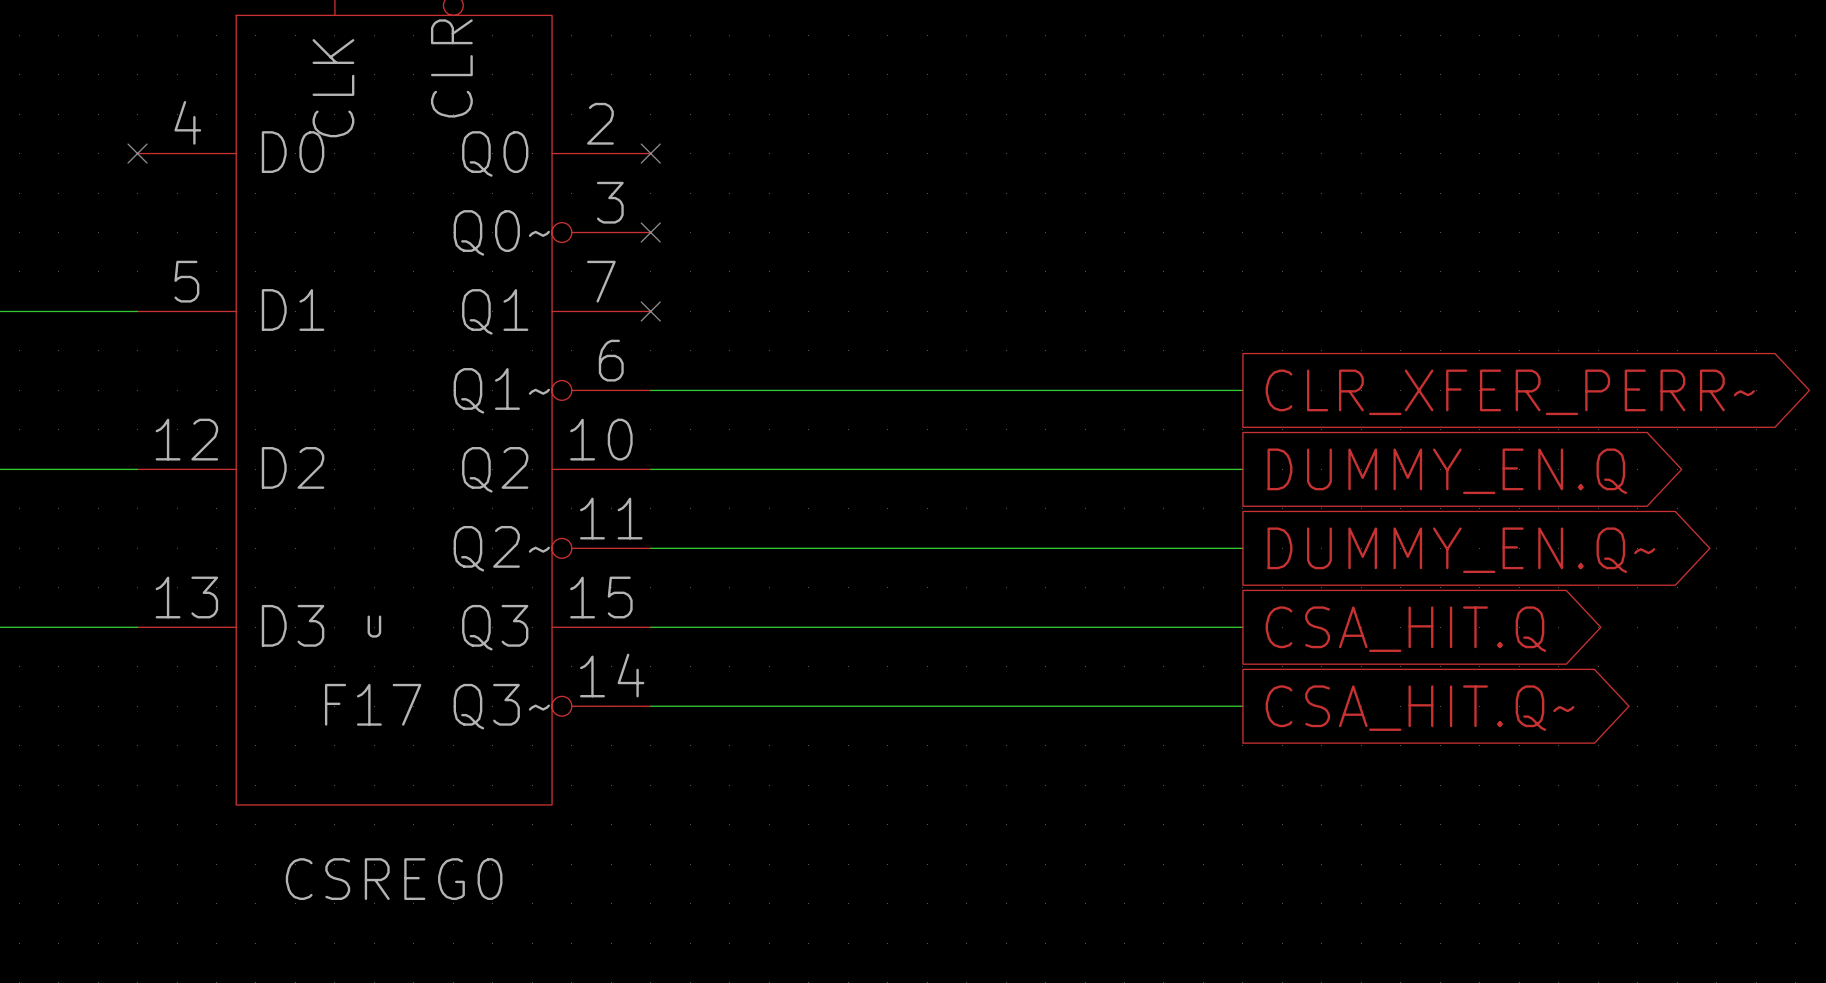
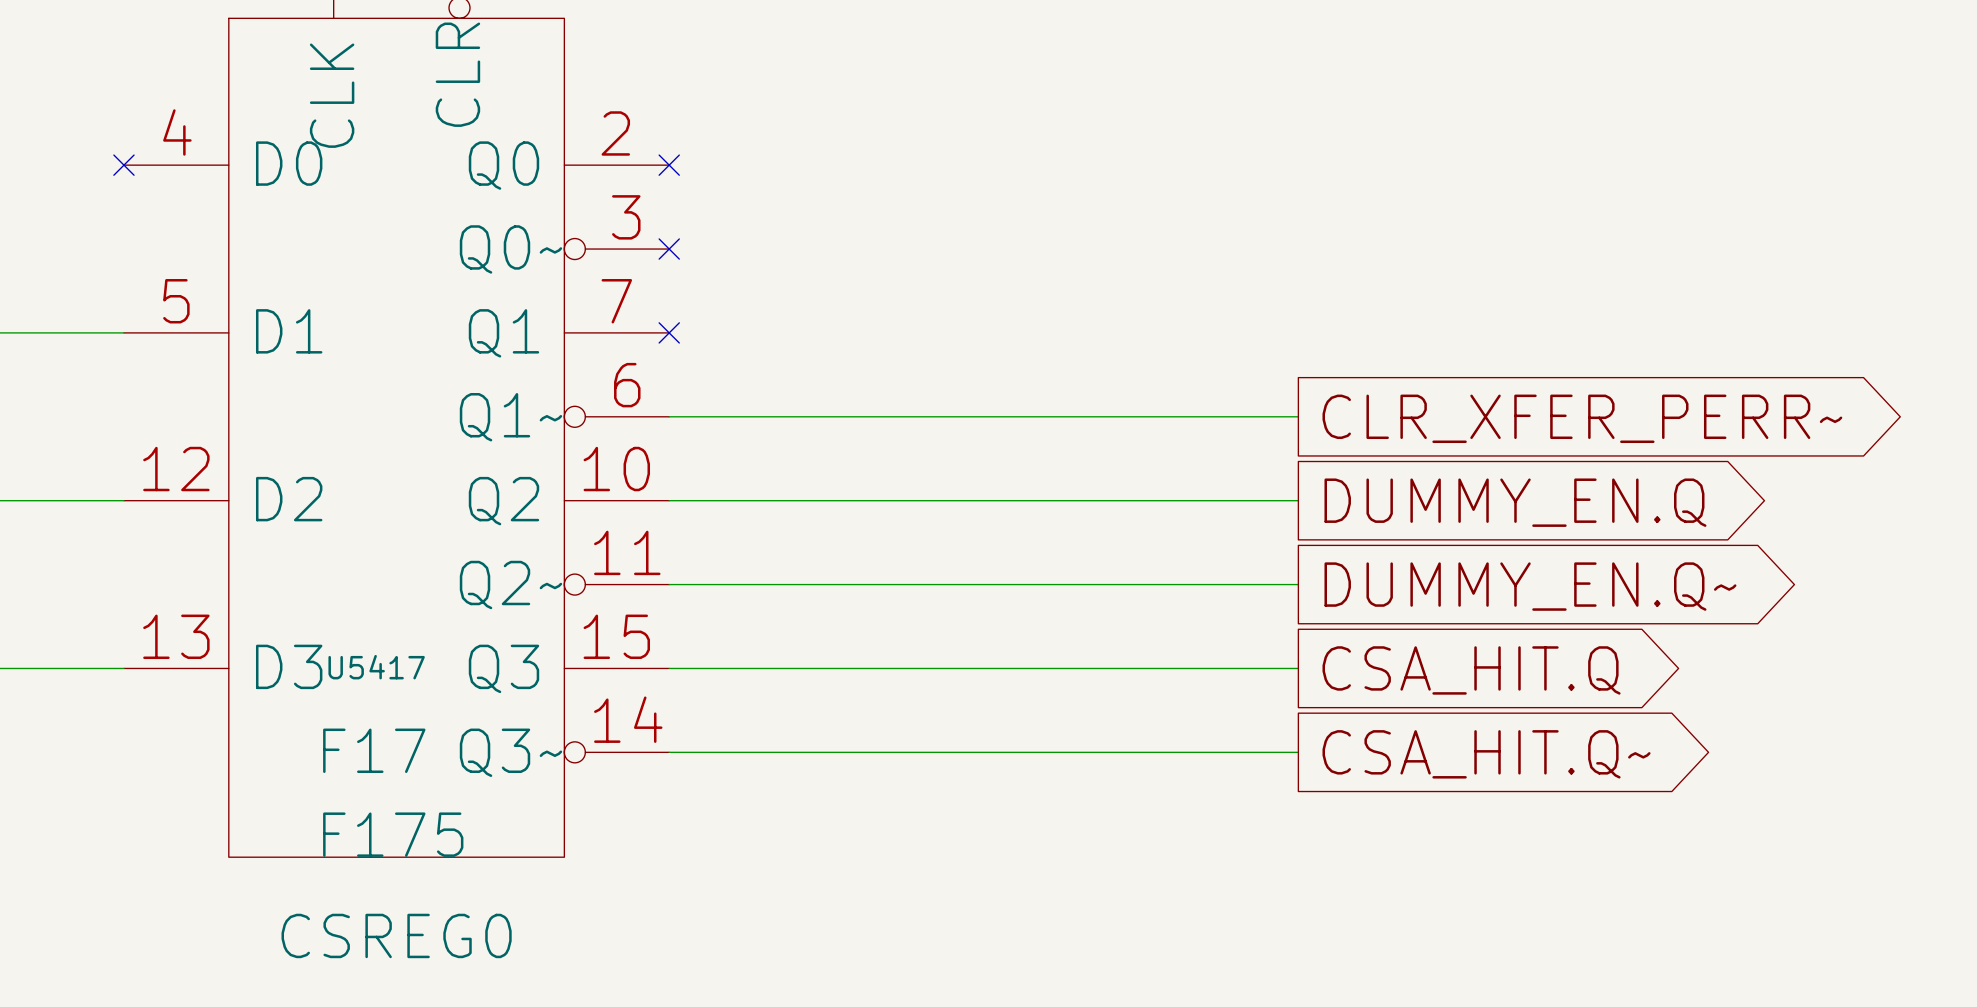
U name: U (374, 626) -> U5417 (376, 667)
U value: none -> F175 (393, 834)

